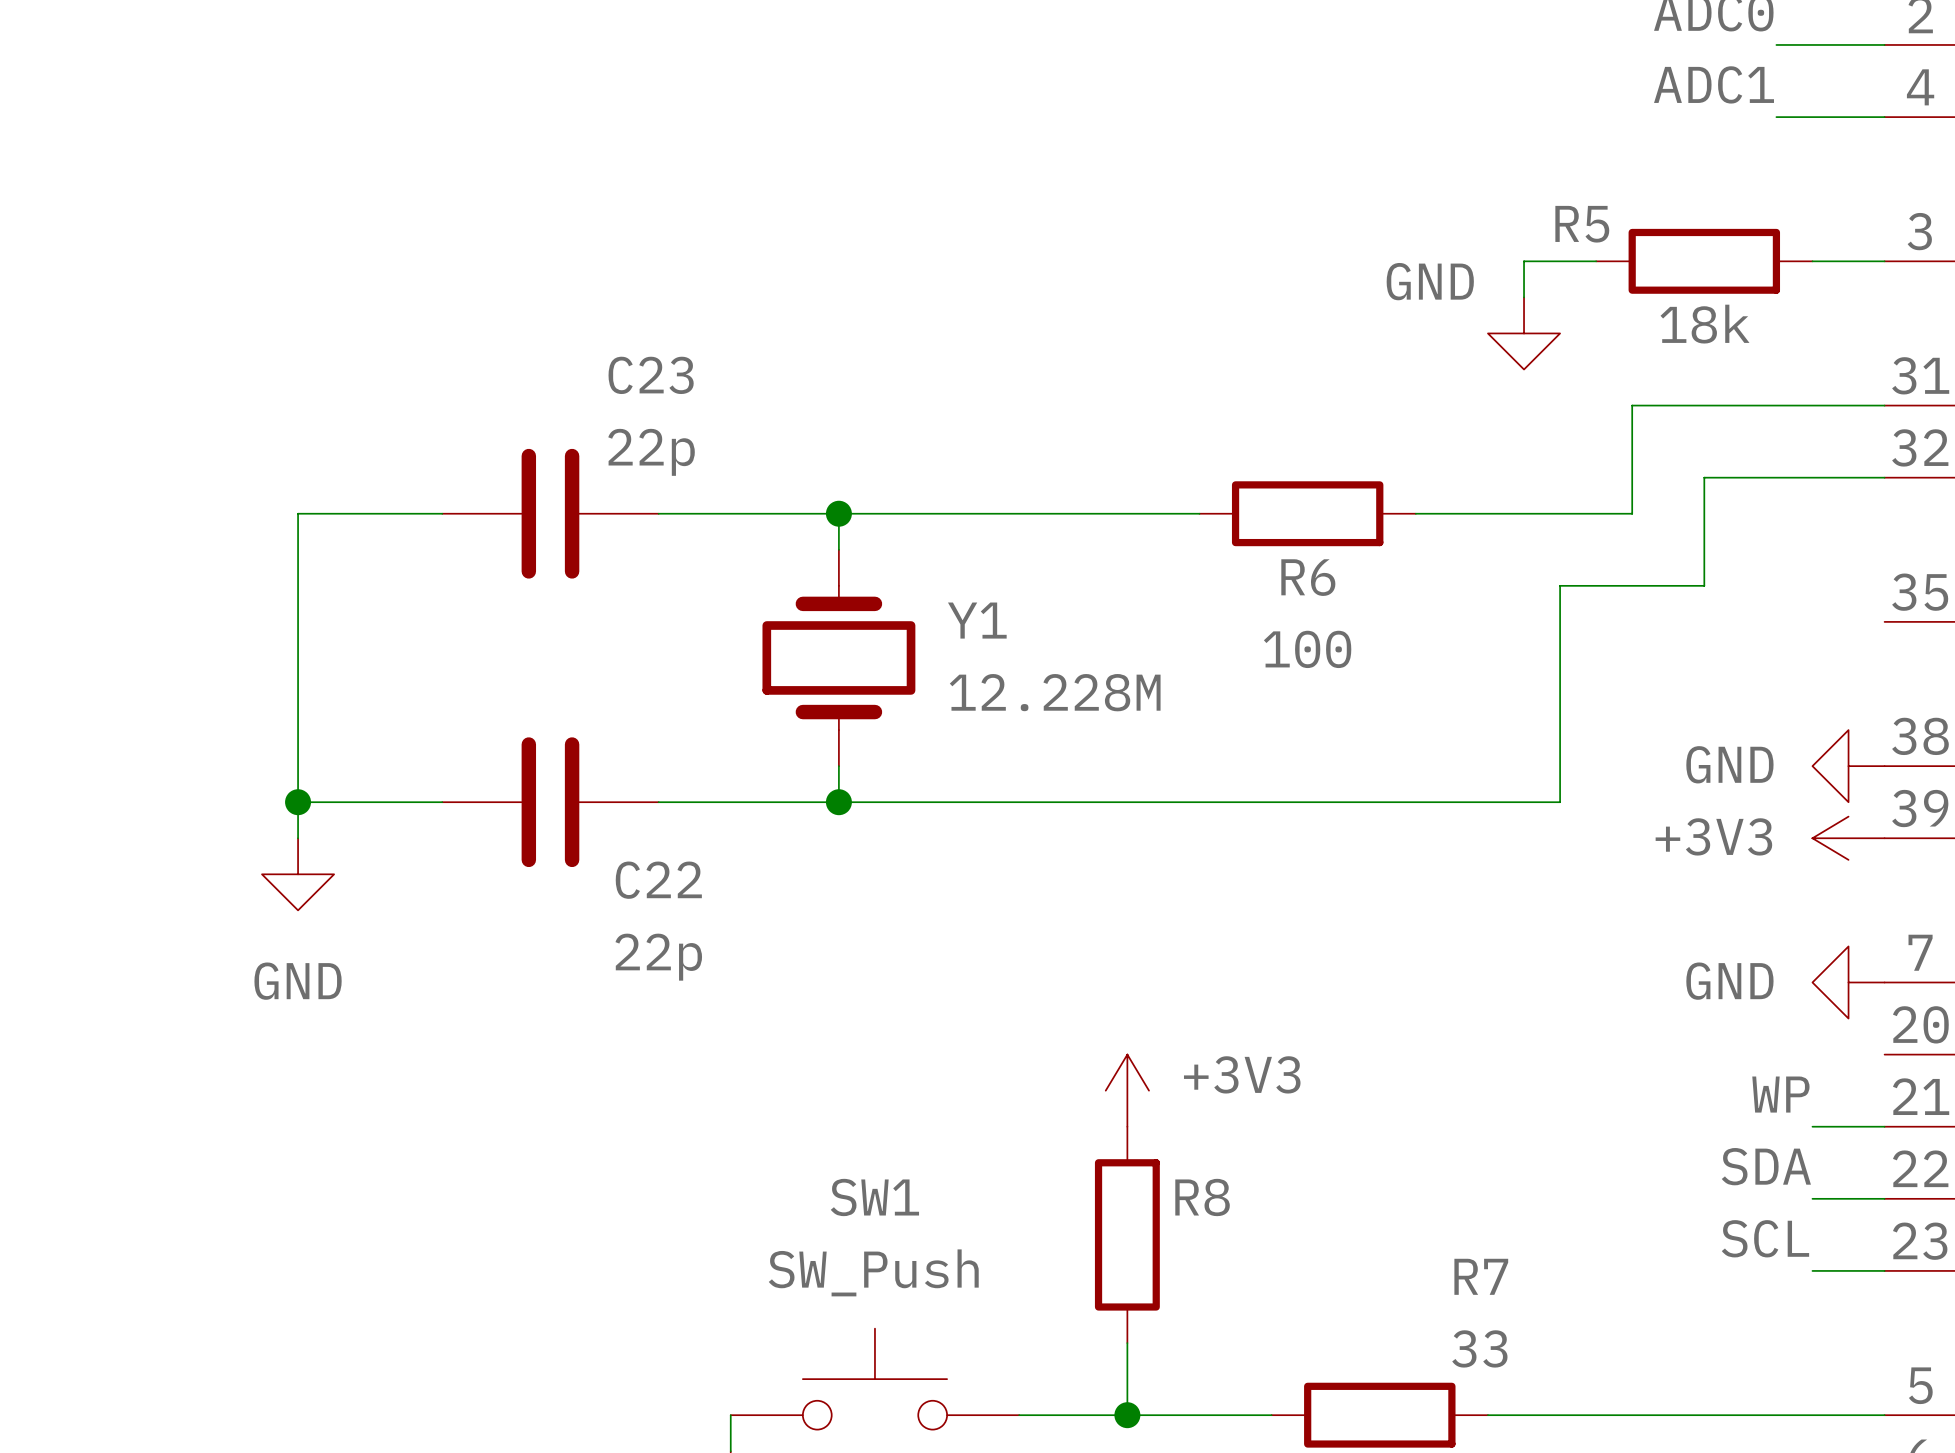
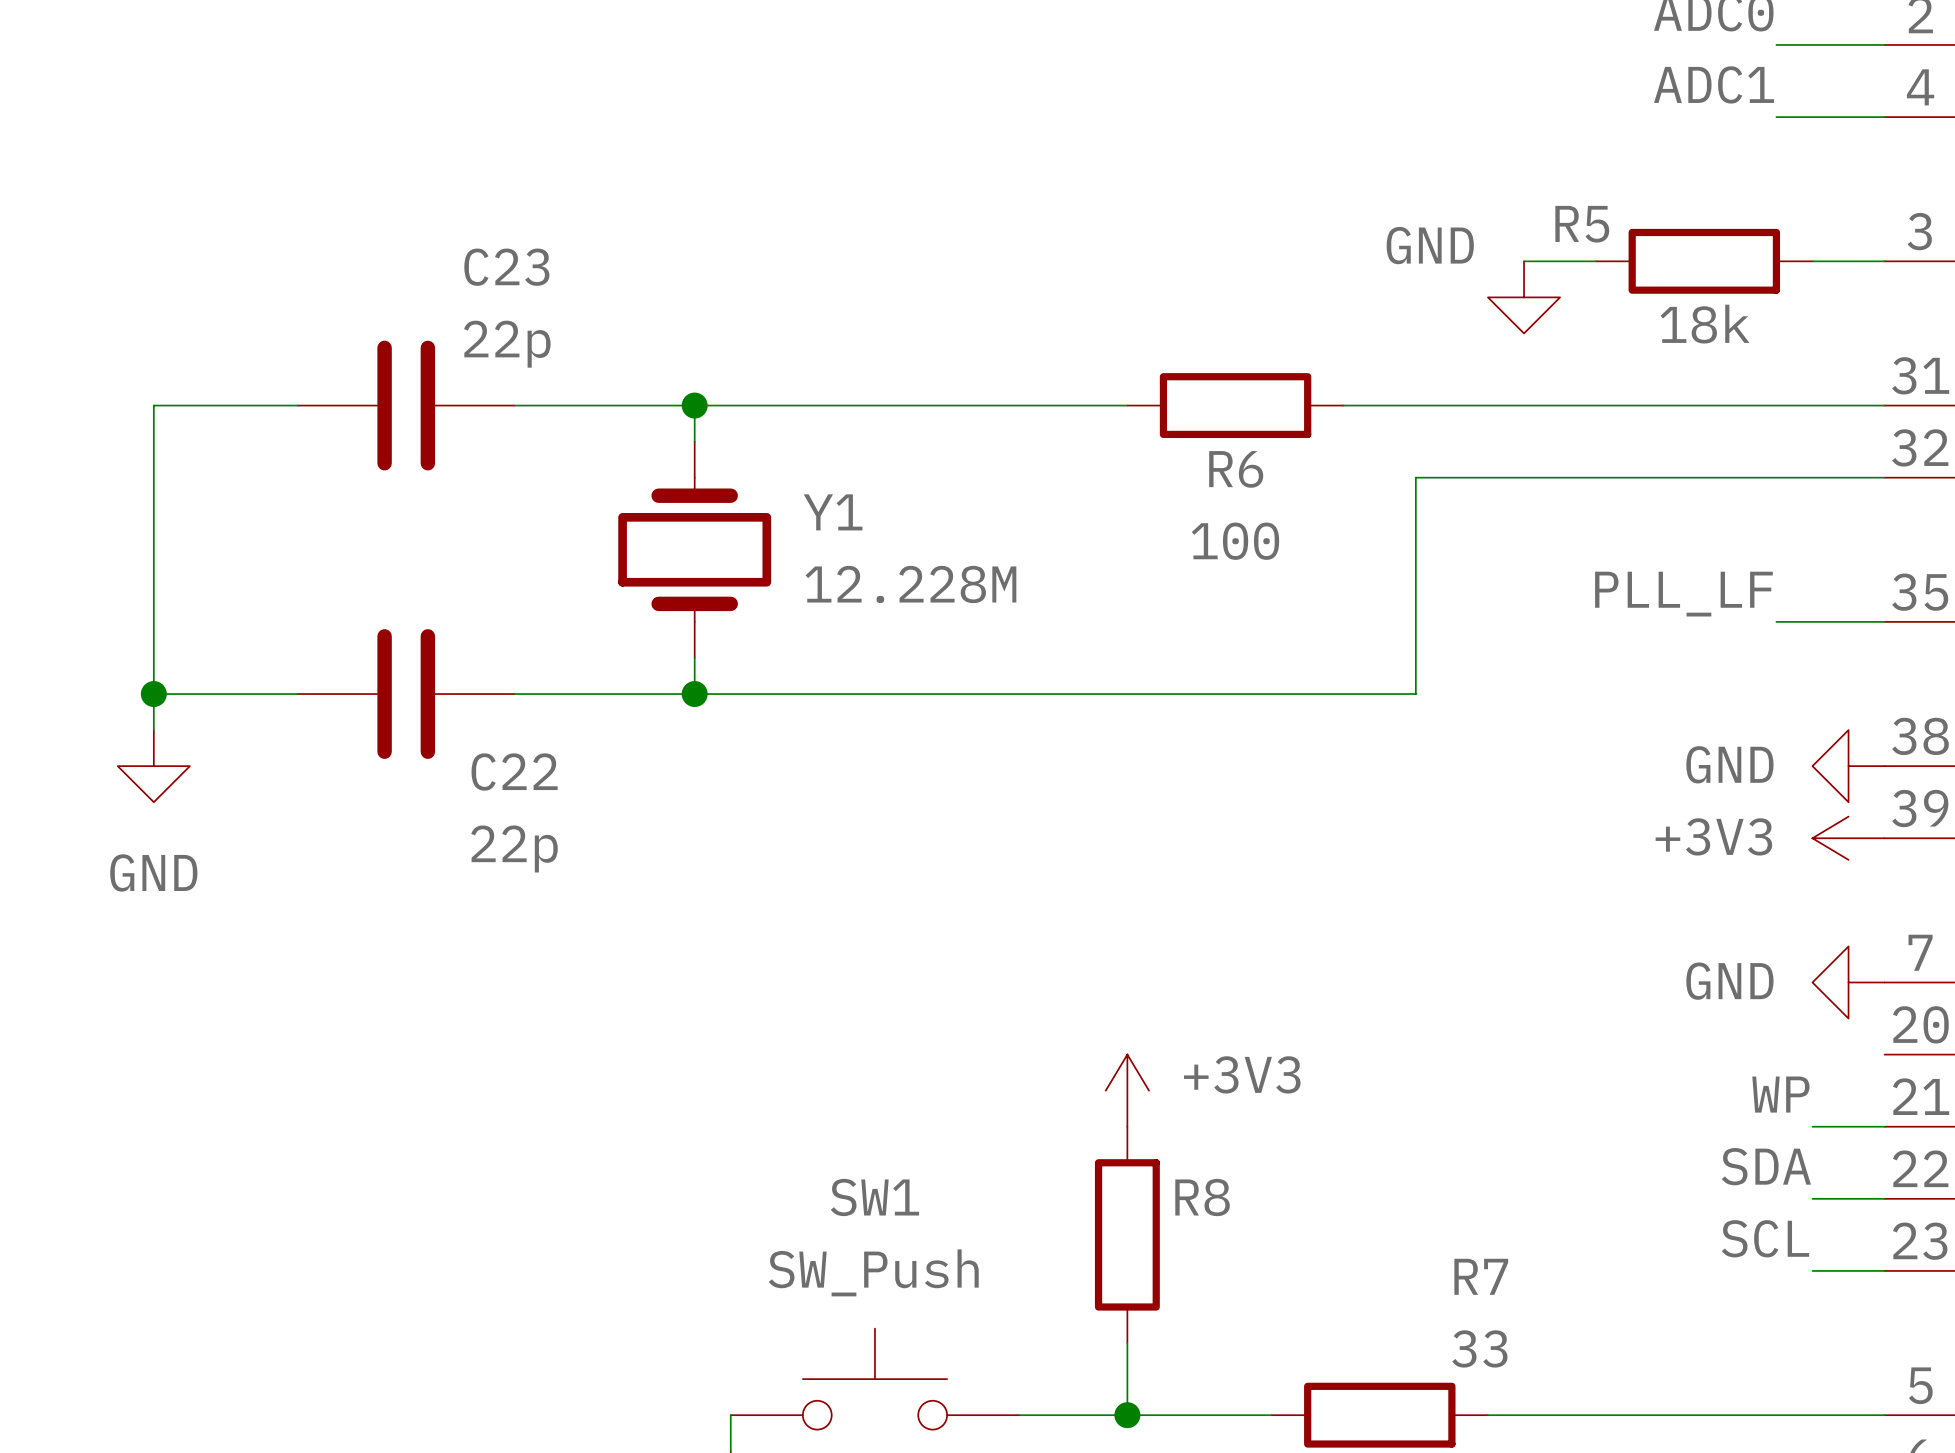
power symbol position: GND (1524, 333) -> GND (1524, 297)
wire: none -> (514, 405) (1127, 405)
junction: none -> (694, 405)
wire: (1632, 405) (1632, 513) (1415, 513) -> (1632, 405) (1343, 405)
wire: (1704, 477) (1704, 585) (1560, 585) (1560, 802) (658, 802) -> (1704, 477) (1415, 477) (1415, 694) (514, 694)
wire: (442, 513) (298, 513) (298, 838) -> (298, 405) (153, 405) (153, 730)
C23 position: (550, 513) -> (406, 405)
wire: (658, 513) (1199, 513) -> none
wire: (838, 513) (838, 549) -> (694, 405) (694, 441)
junction: (838, 513) -> none
R6 position: (1307, 513) -> (1235, 405)
label: none -> PLL_LF (1683, 594)
wire: none -> (1776, 621) (1884, 621)
Y1 position: (838, 657) -> (694, 549)
junction: none -> (153, 694)
junction: none -> (694, 694)
wire: (838, 766) (838, 802) -> (694, 657) (694, 694)
wire: (298, 802) (442, 802) -> (153, 694) (298, 694)
junction: (298, 802) -> none
C22 position: (550, 802) -> (406, 694)
junction: (838, 802) -> none
power symbol position: GND (298, 874) -> GND (153, 766)

